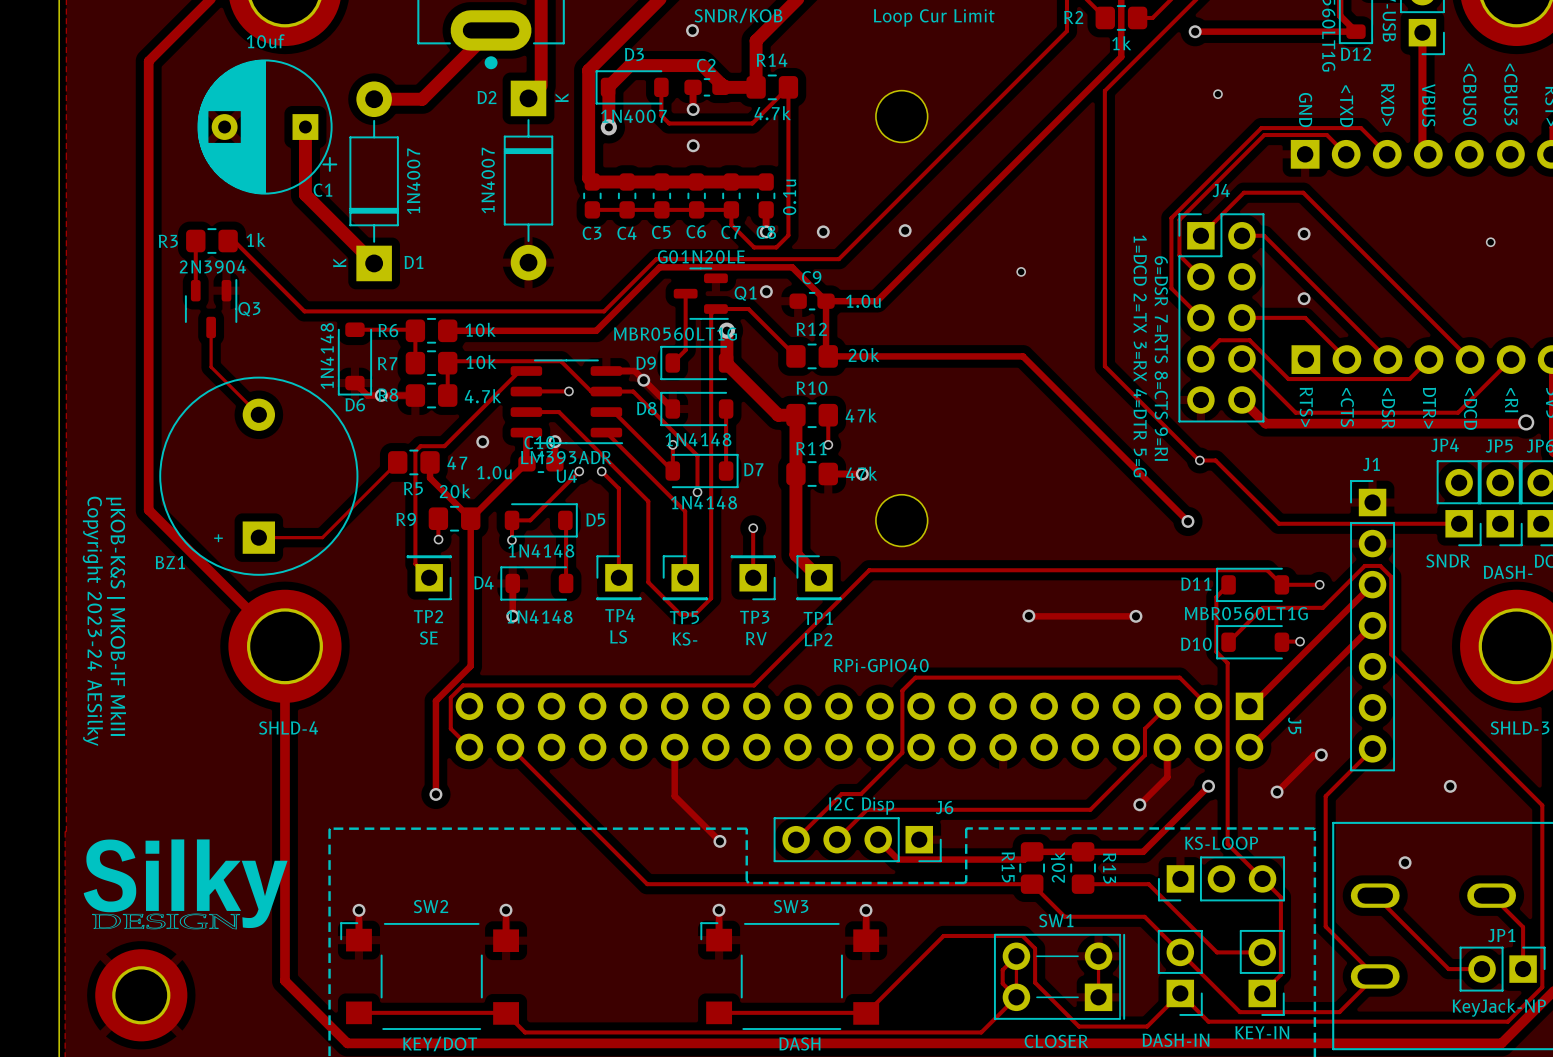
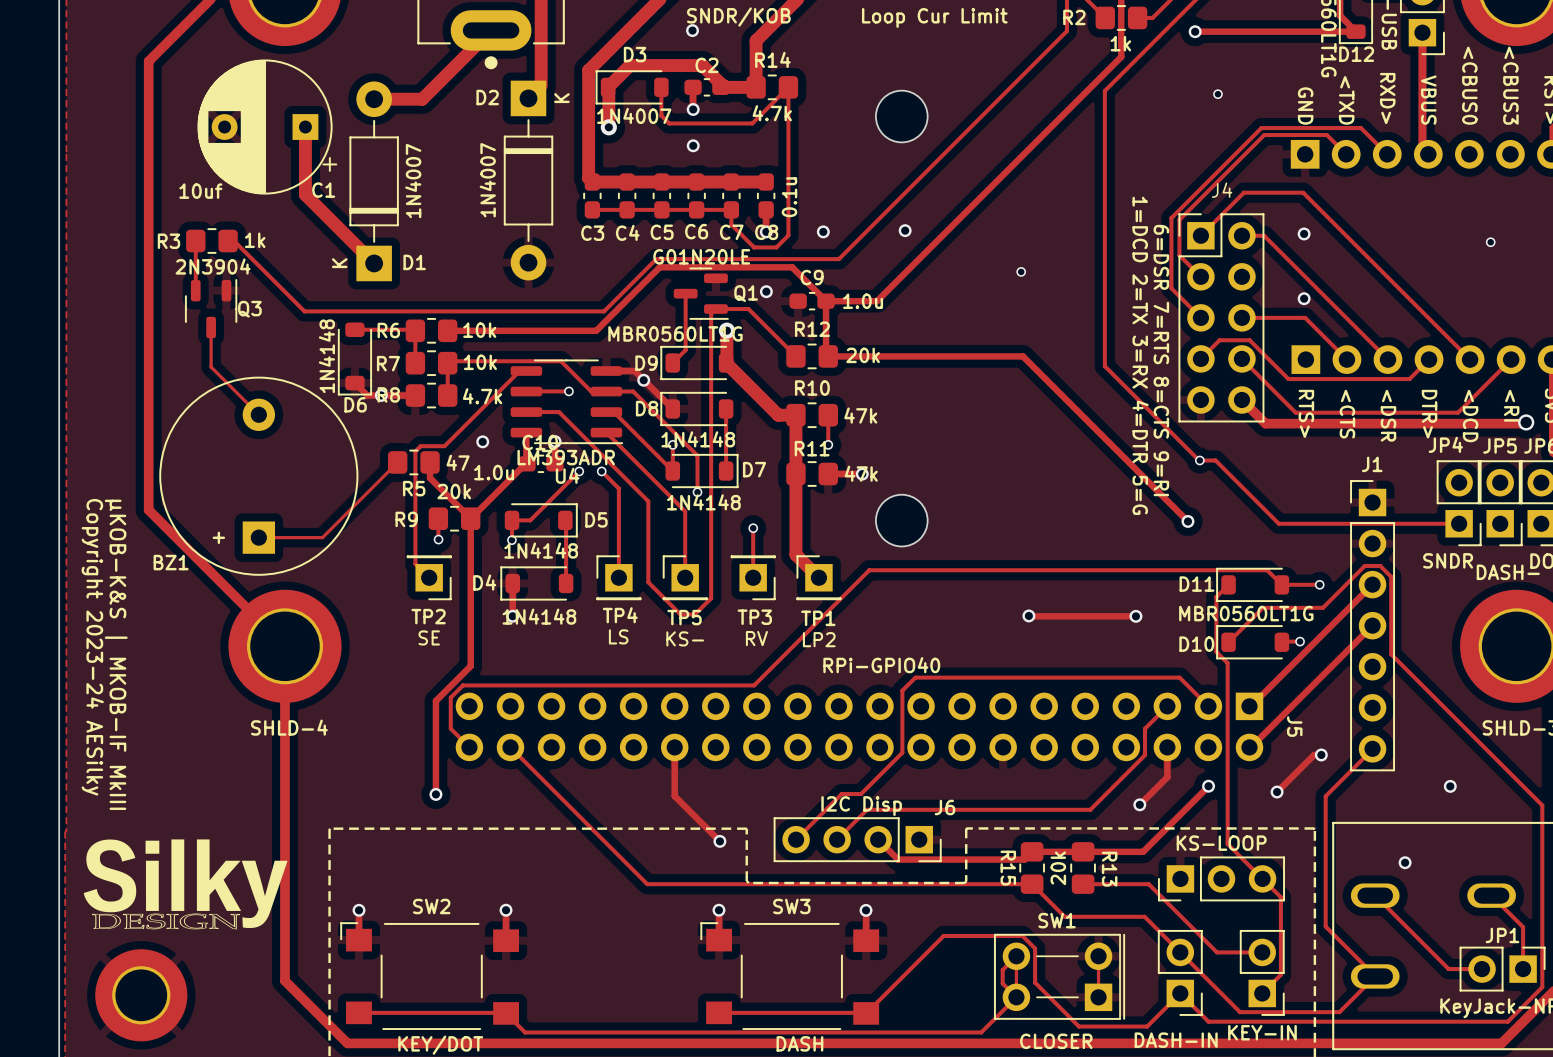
C1 value position: 10uf (265, 41) -> 10uf (200, 191)

